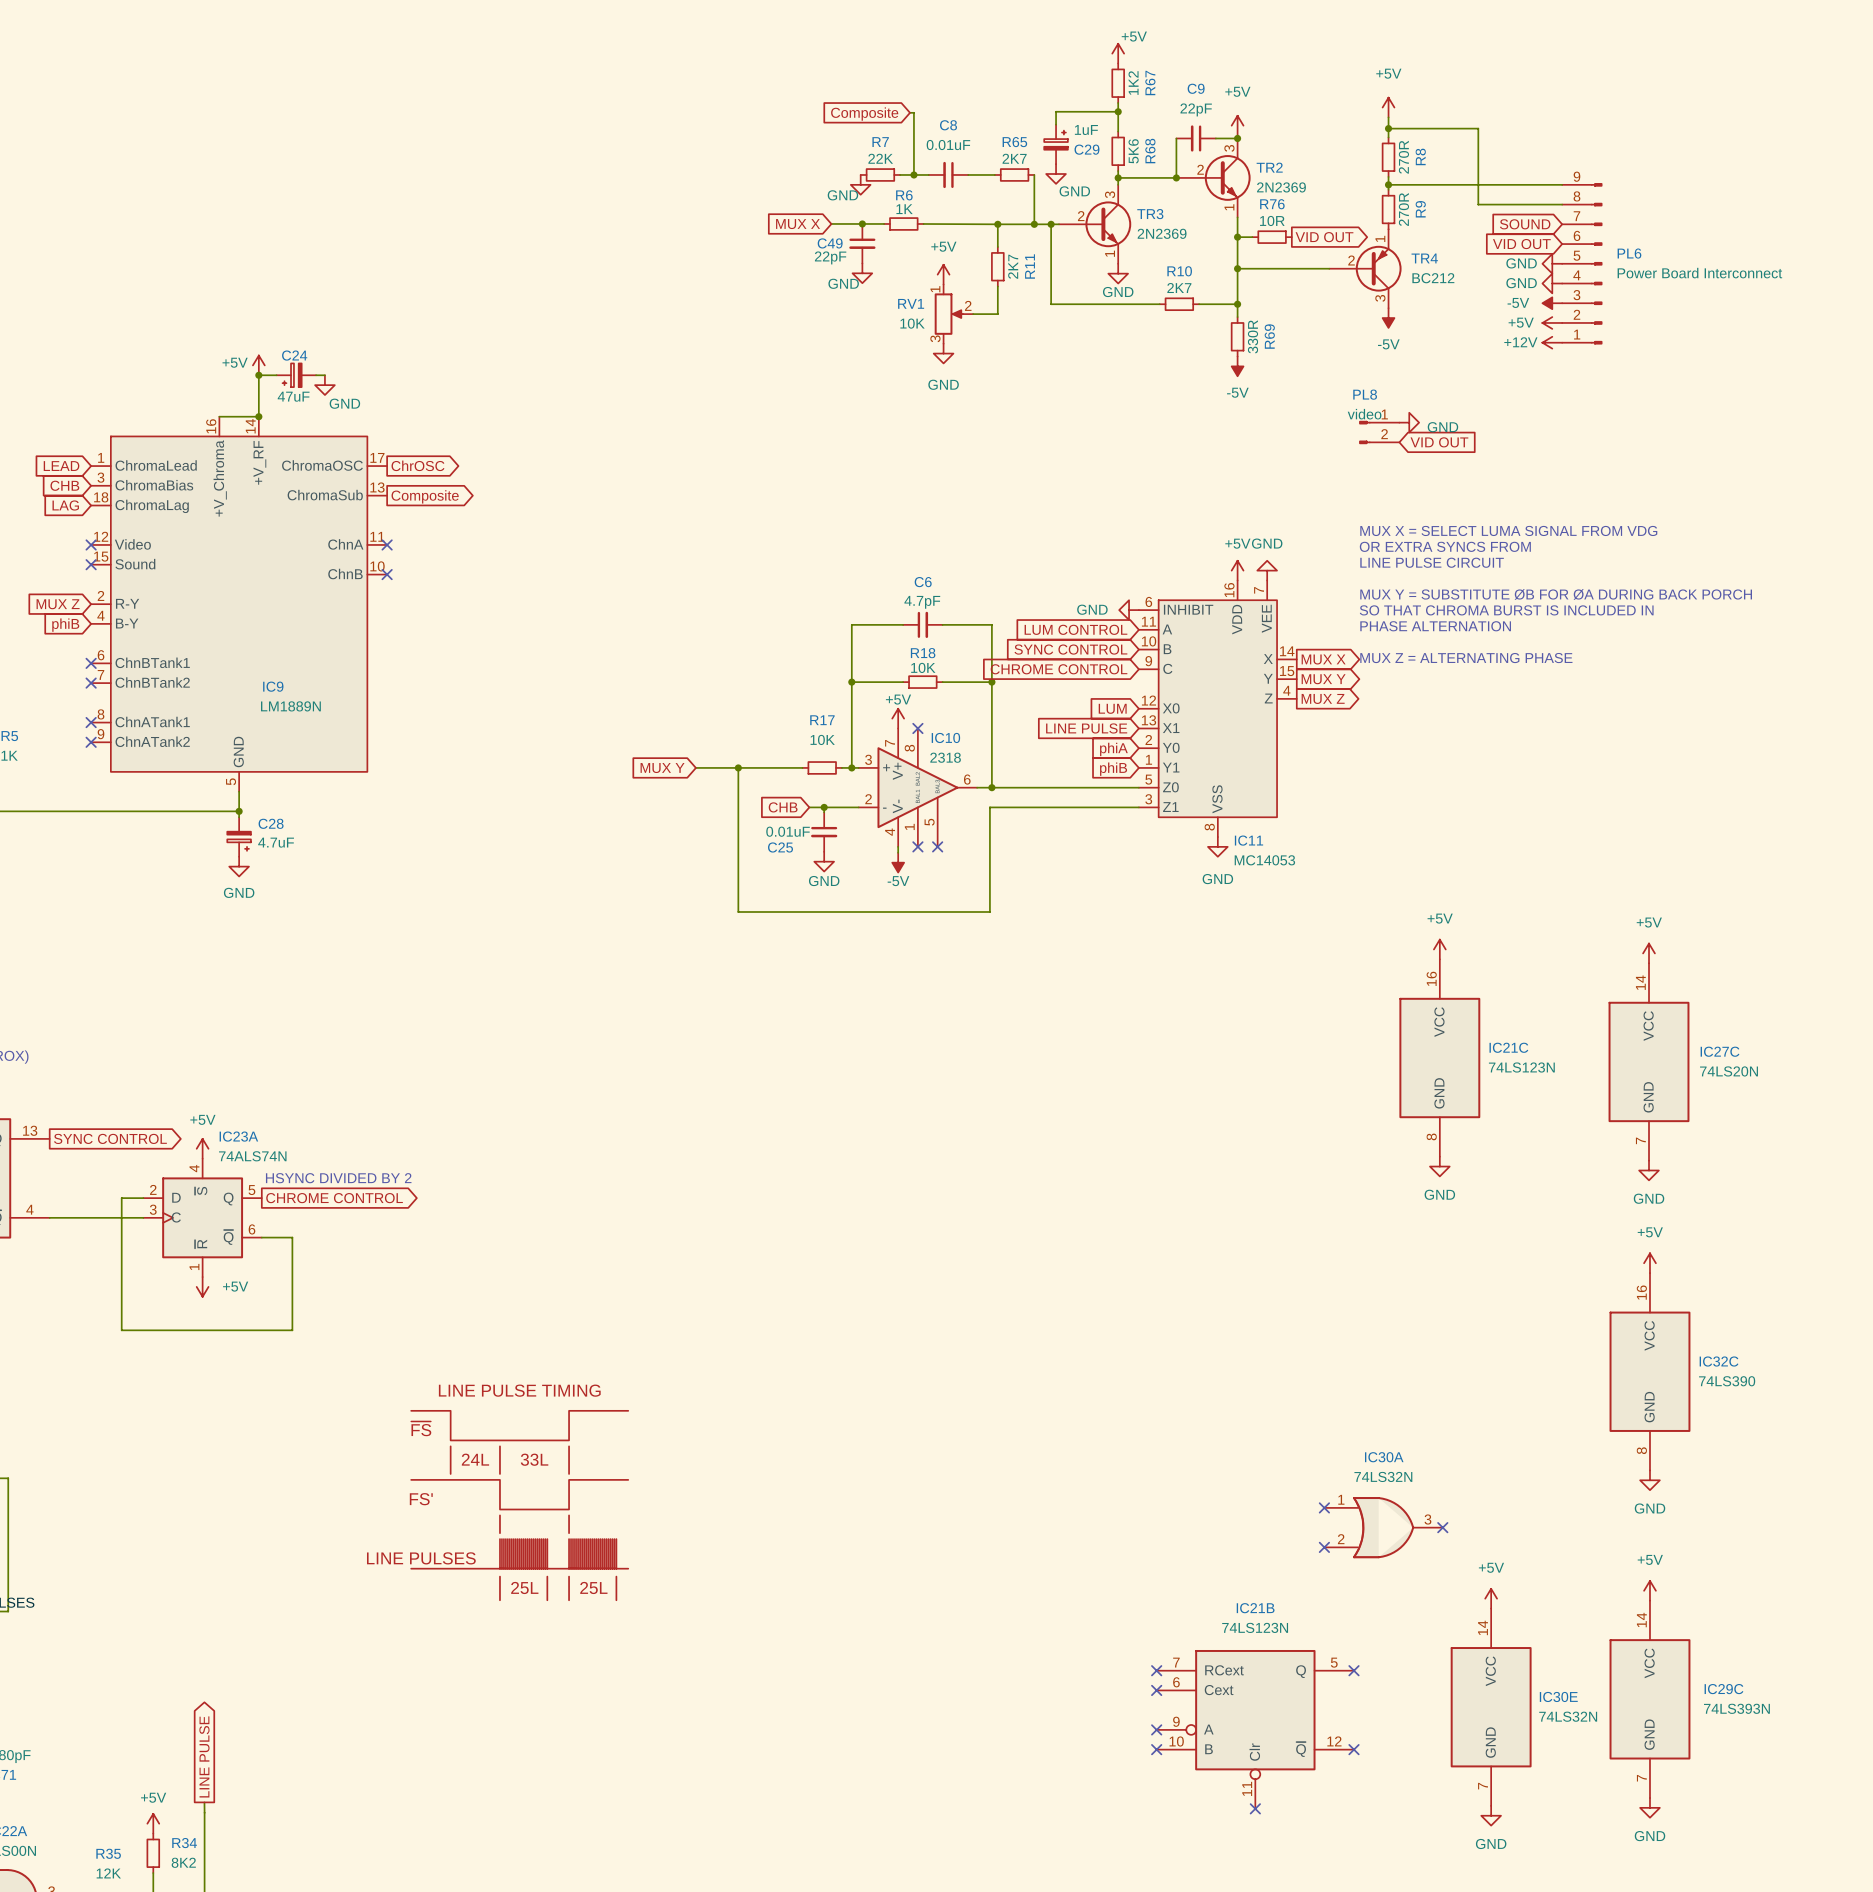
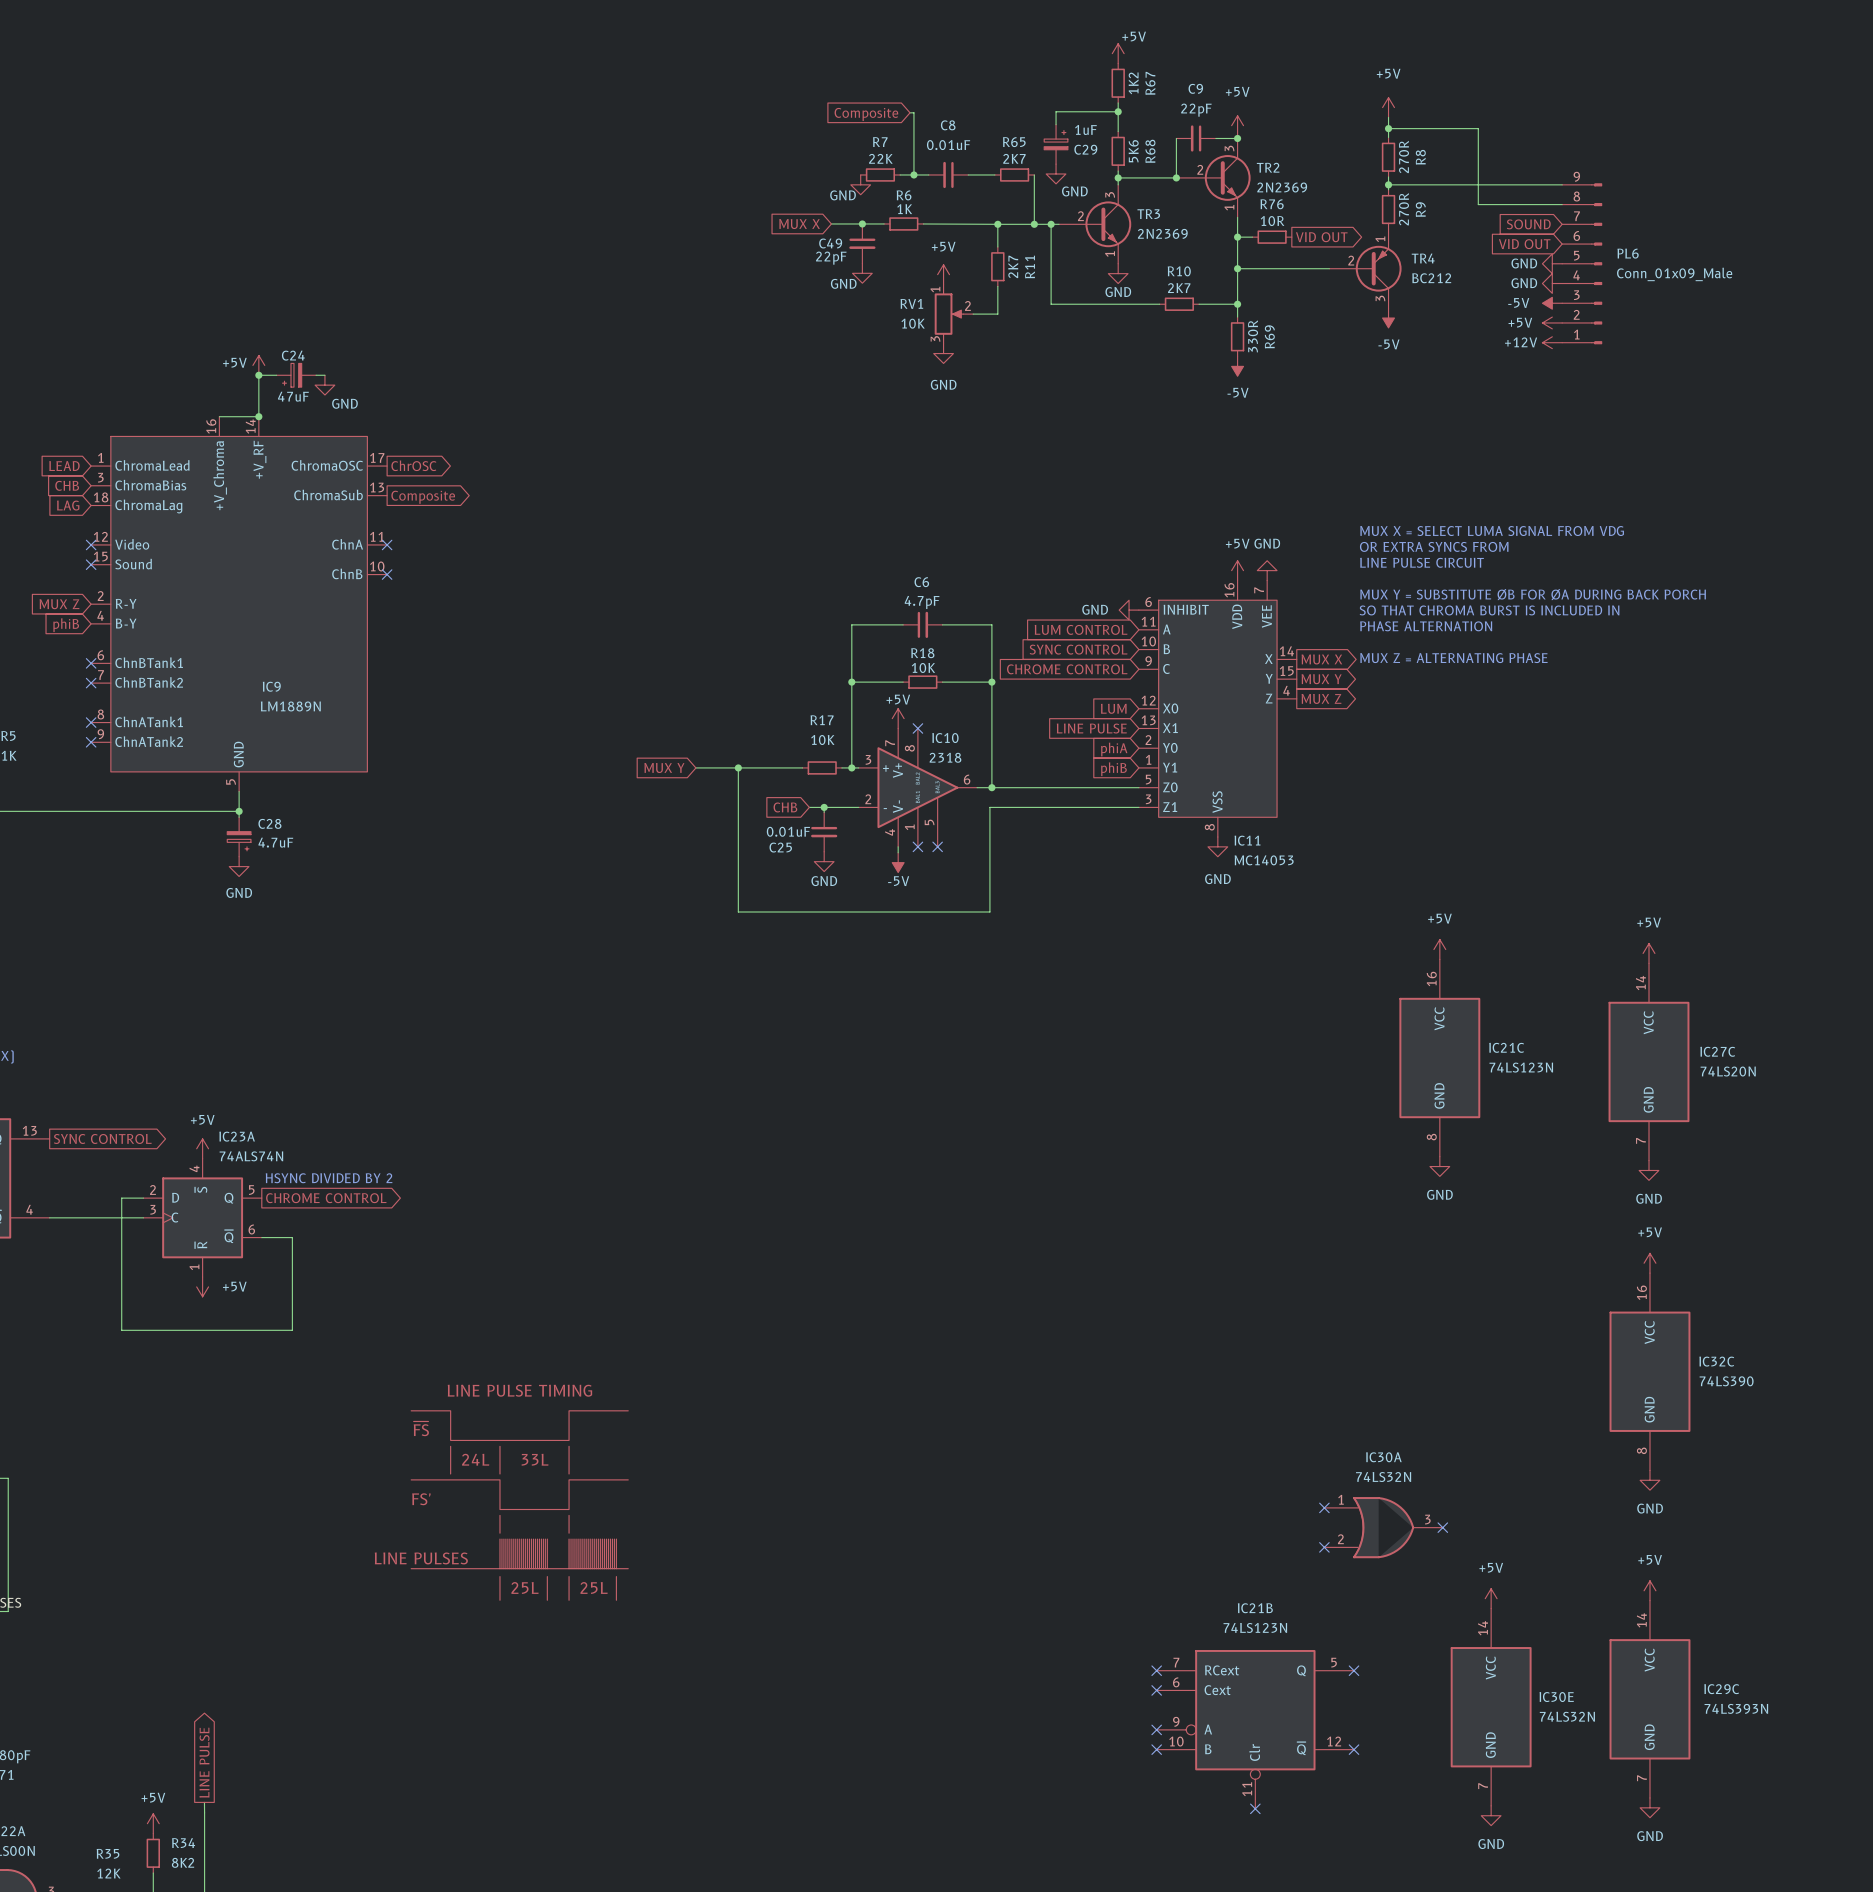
PL6 value: Power Board Interconnect (1699, 273) -> Conn_01x09_Male (1674, 274)
power symbol: GND (1409, 422) -> none
PL8: video (1379, 432) -> none
global label: VID OUT (1439, 442) -> none

